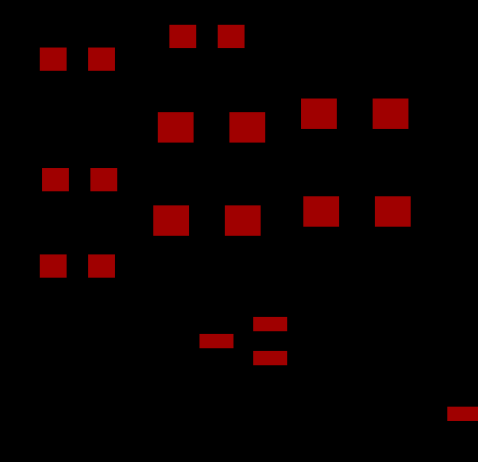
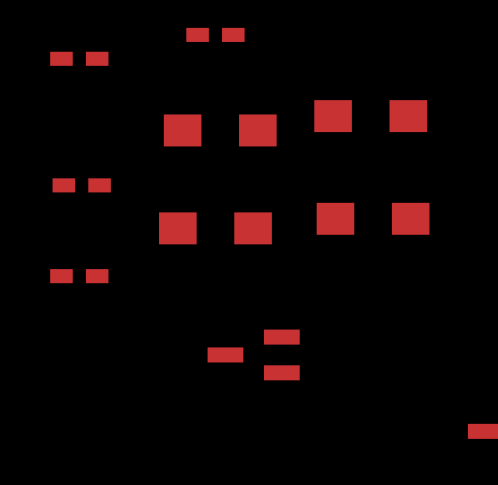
part footprint: [169, 24, 245, 49] -> [186, 27, 245, 42]
part footprint: [39, 47, 115, 71] -> [50, 51, 109, 66]
part footprint: [42, 168, 118, 192] -> [52, 178, 111, 193]
part footprint: [39, 254, 115, 278] -> [50, 269, 109, 284]

